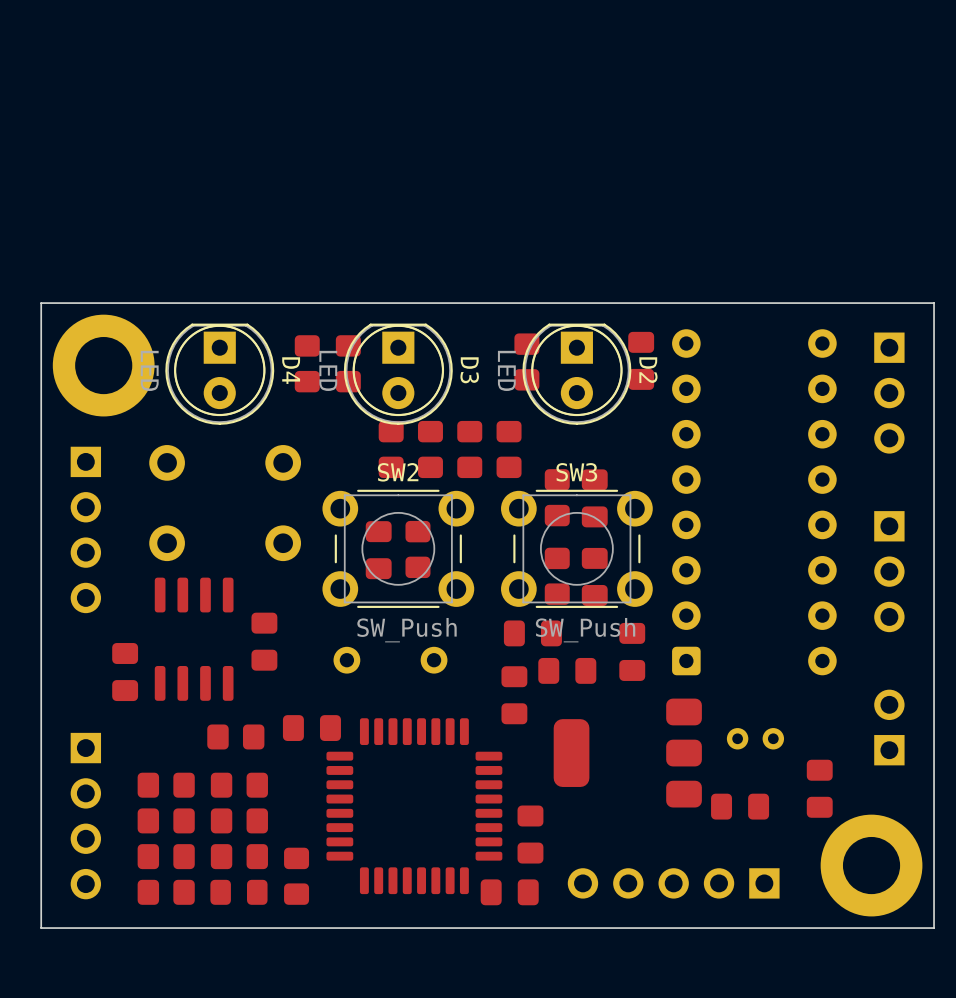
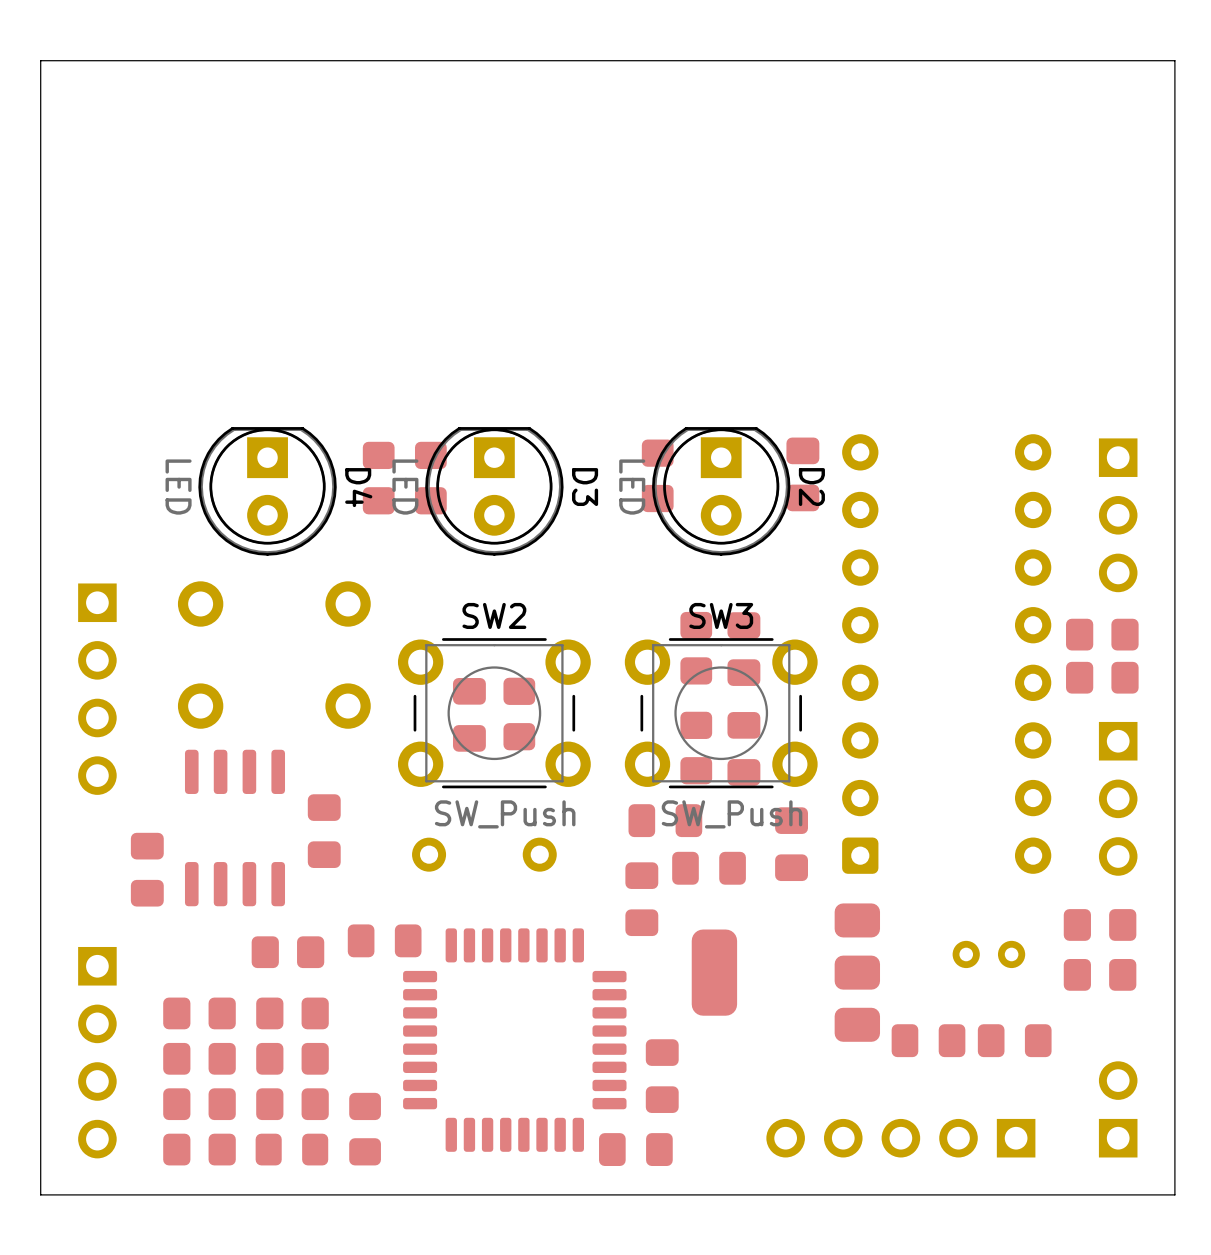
board edge: (934, 303) (41, 303) -> (1174, 400) (1174, 60) (40, 60) (40, 400)
part: (103, 365) -> none
part: (391, 449) -> none
part: (430, 449) -> none
part: (469, 449) -> none
part: (509, 449) -> none
part: none -> (1102, 634)
part: none -> (1102, 677)
part position: (889, 571) -> (1118, 798)
part: none -> (1100, 924)
part position: (889, 727) -> (1118, 1109)
part position: (755, 738) -> (988, 954)
part: none -> (1100, 974)
part rotation: 0° (819, 788) -> 90° clockwise (1014, 1040)
part: (871, 865) -> none
part position: (673, 883) -> (900, 1138)

